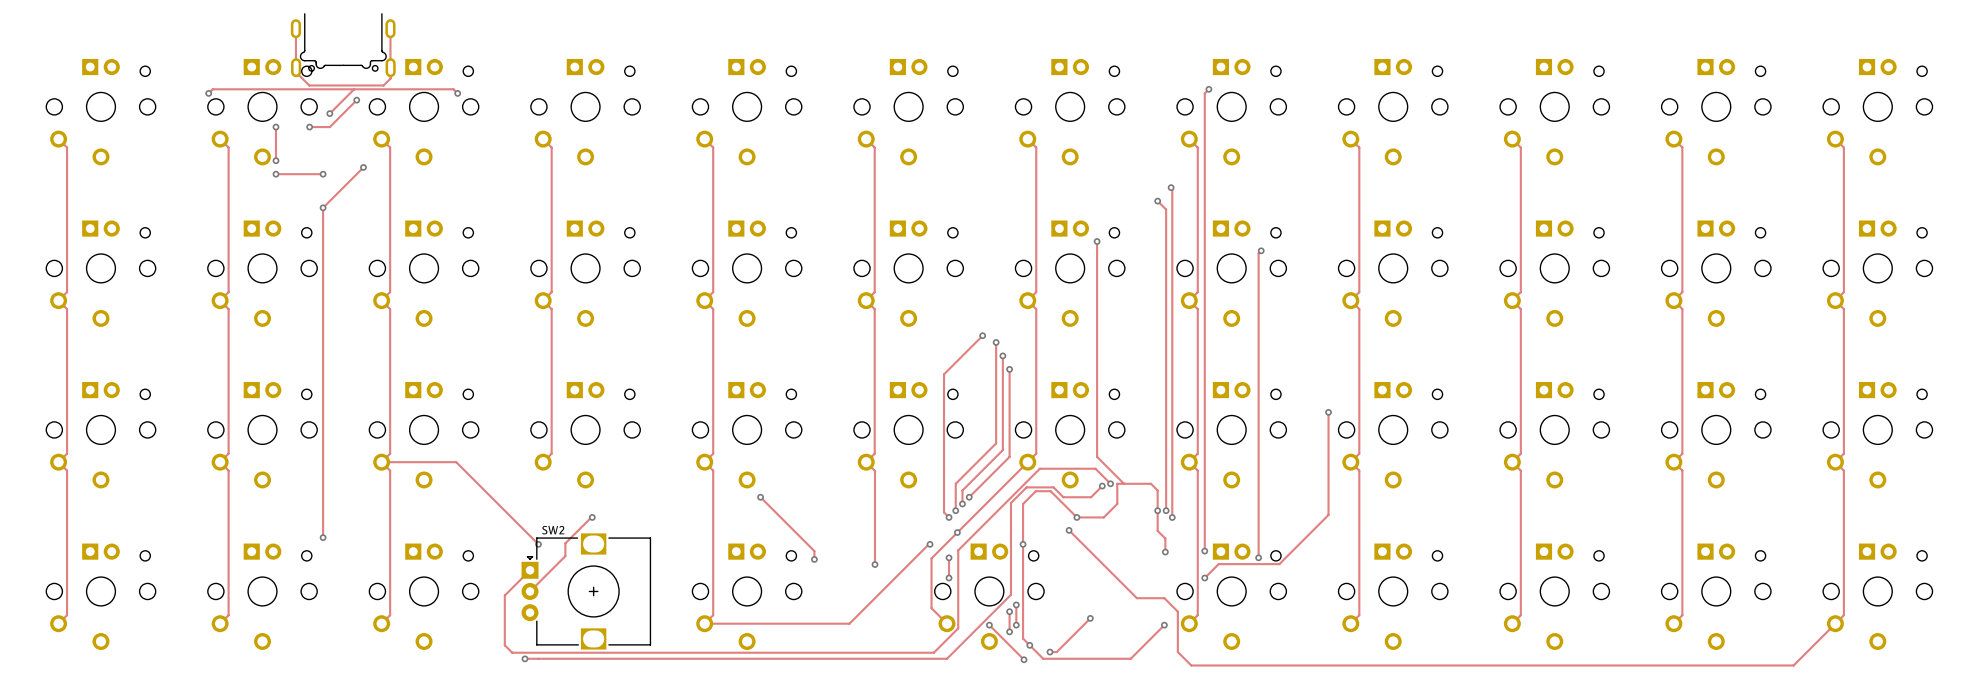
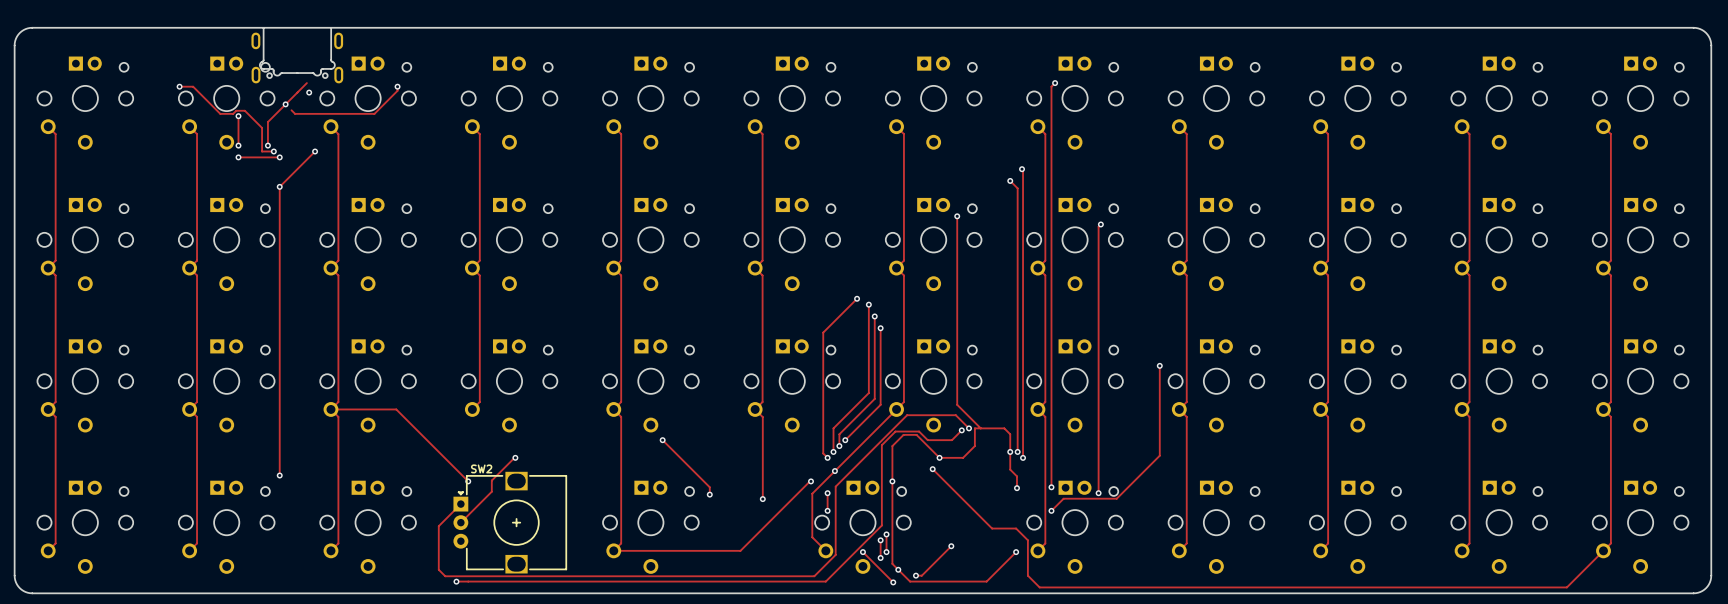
board edge: none -> (32, 27) (1698, 28) (1707, 34) (1711, 45) (1710, 580) (1704, 589) (1693, 593) (27, 592) (18, 586) (14, 575) (14, 45) (19, 32) (32, 27)
track: (295, 28) (296, 72) (309, 85) (383, 85) (390, 78) (390, 28) -> none
part: (343, 45) -> none
part: none -> (297, 55)
track: (208, 93) (212, 89) (453, 89) (457, 93) -> (291, 110) (295, 113) (374, 113) (397, 90) (397, 86)
track: none -> (179, 86) (193, 86) (220, 113) (233, 113) (236, 110) (244, 110) (262, 127) (262, 151) (273, 151)
track: (356, 100) (329, 127) (309, 127) -> none
track: none -> (285, 104) (267, 122) (267, 145)
via: (309, 127) -> none
via: none -> (267, 145)
via: none -> (273, 151)

